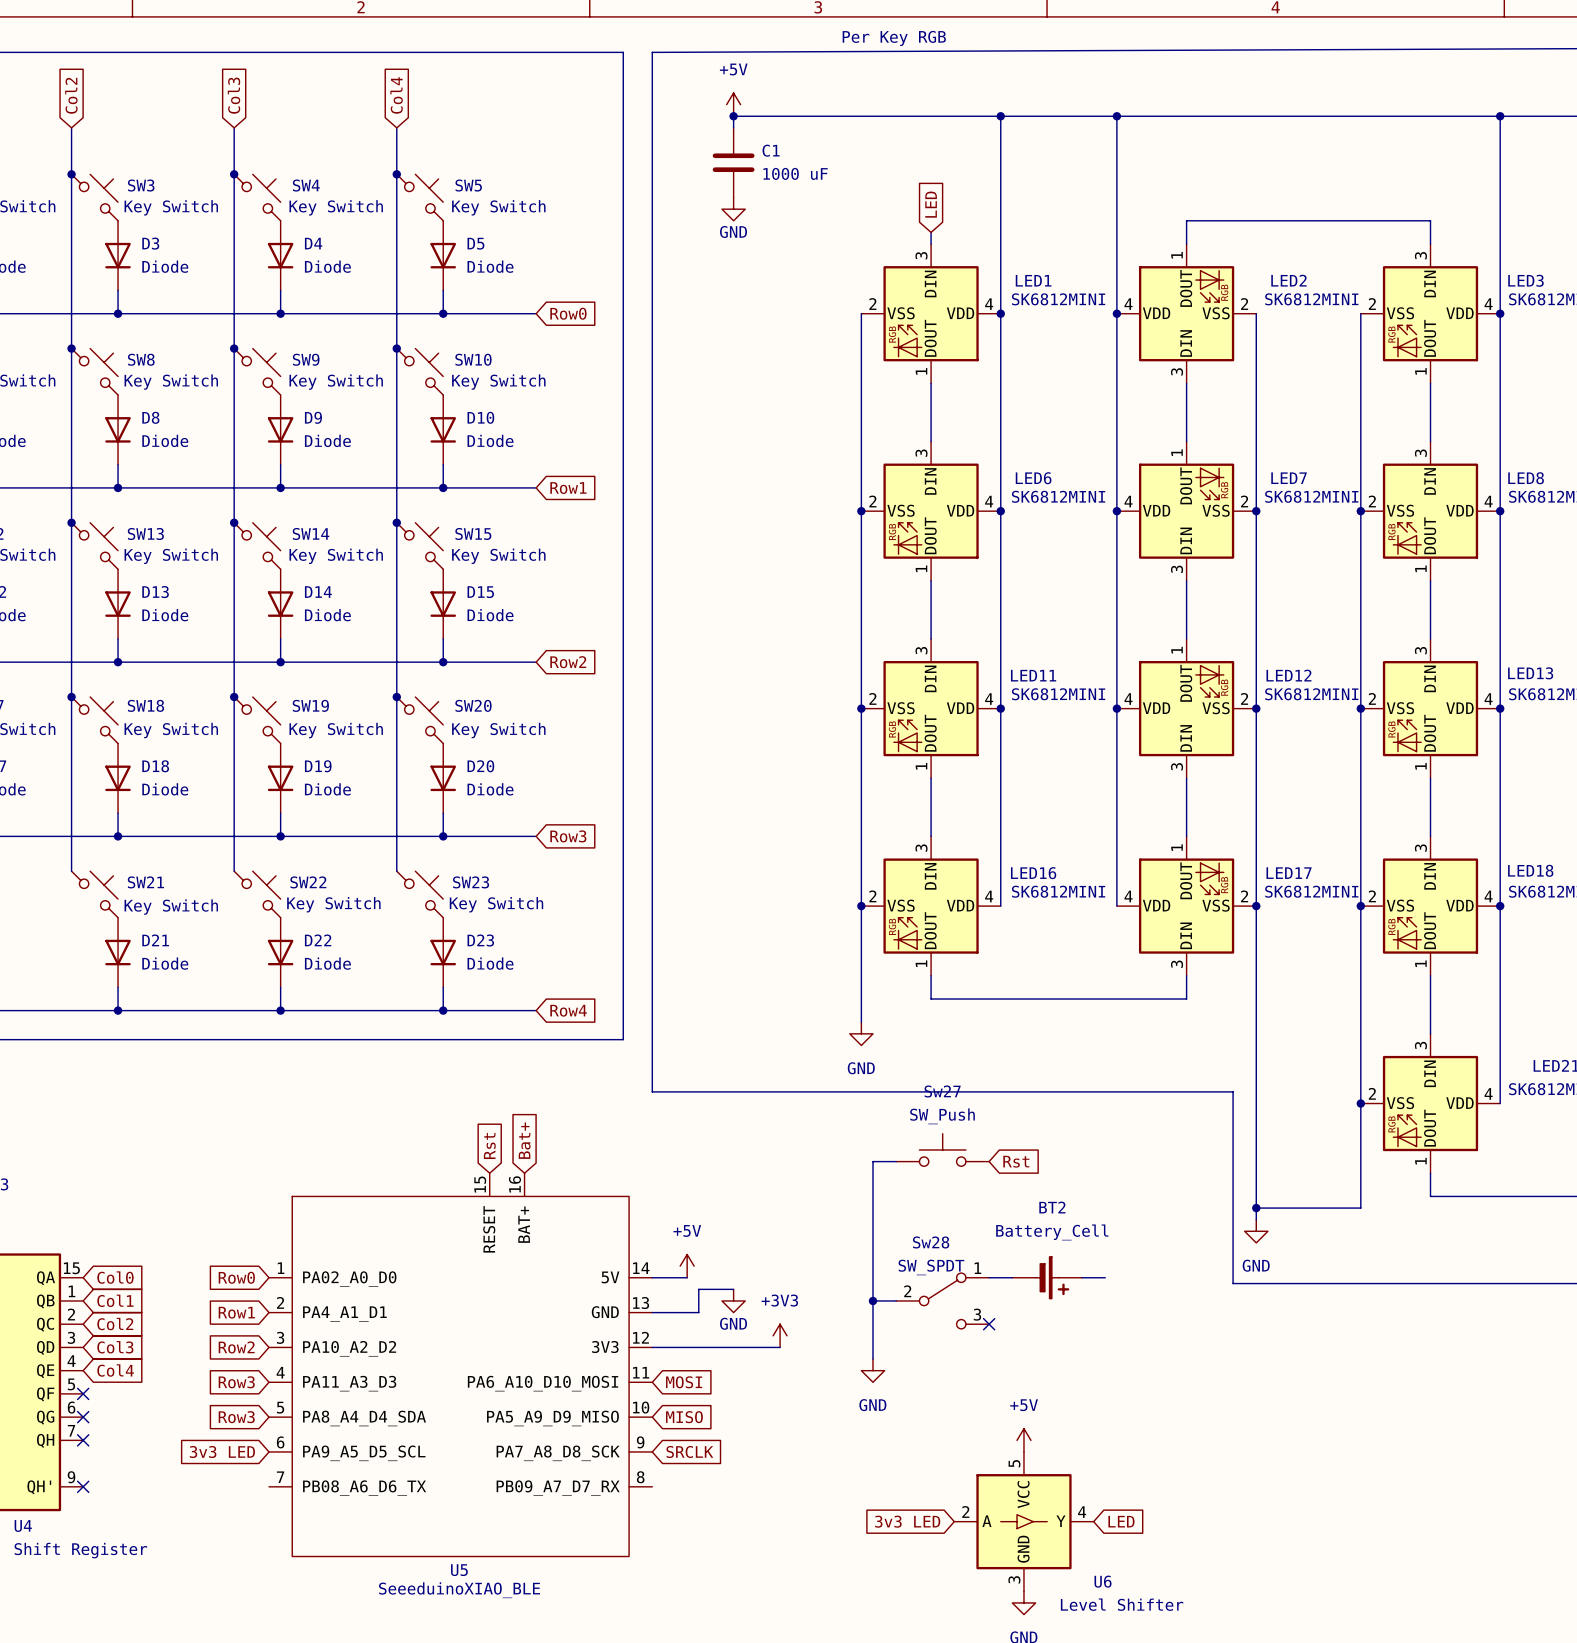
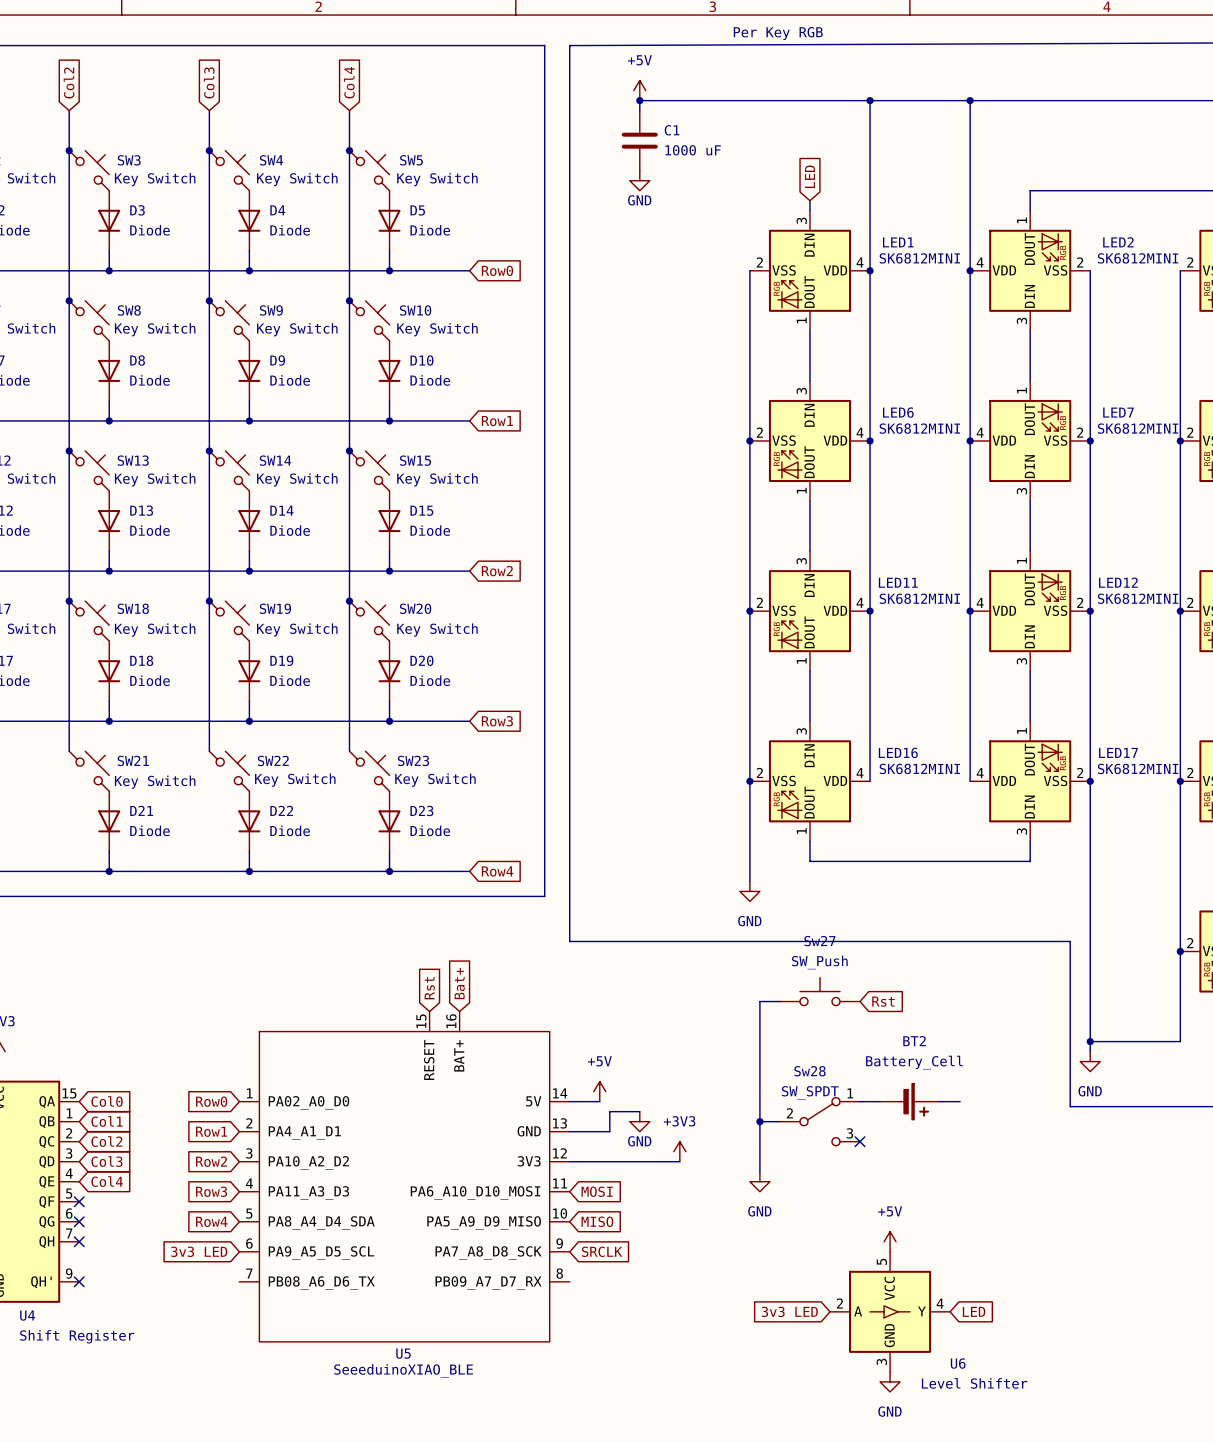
global label: Row3 (236, 1417) -> Row4 (211, 1221)

